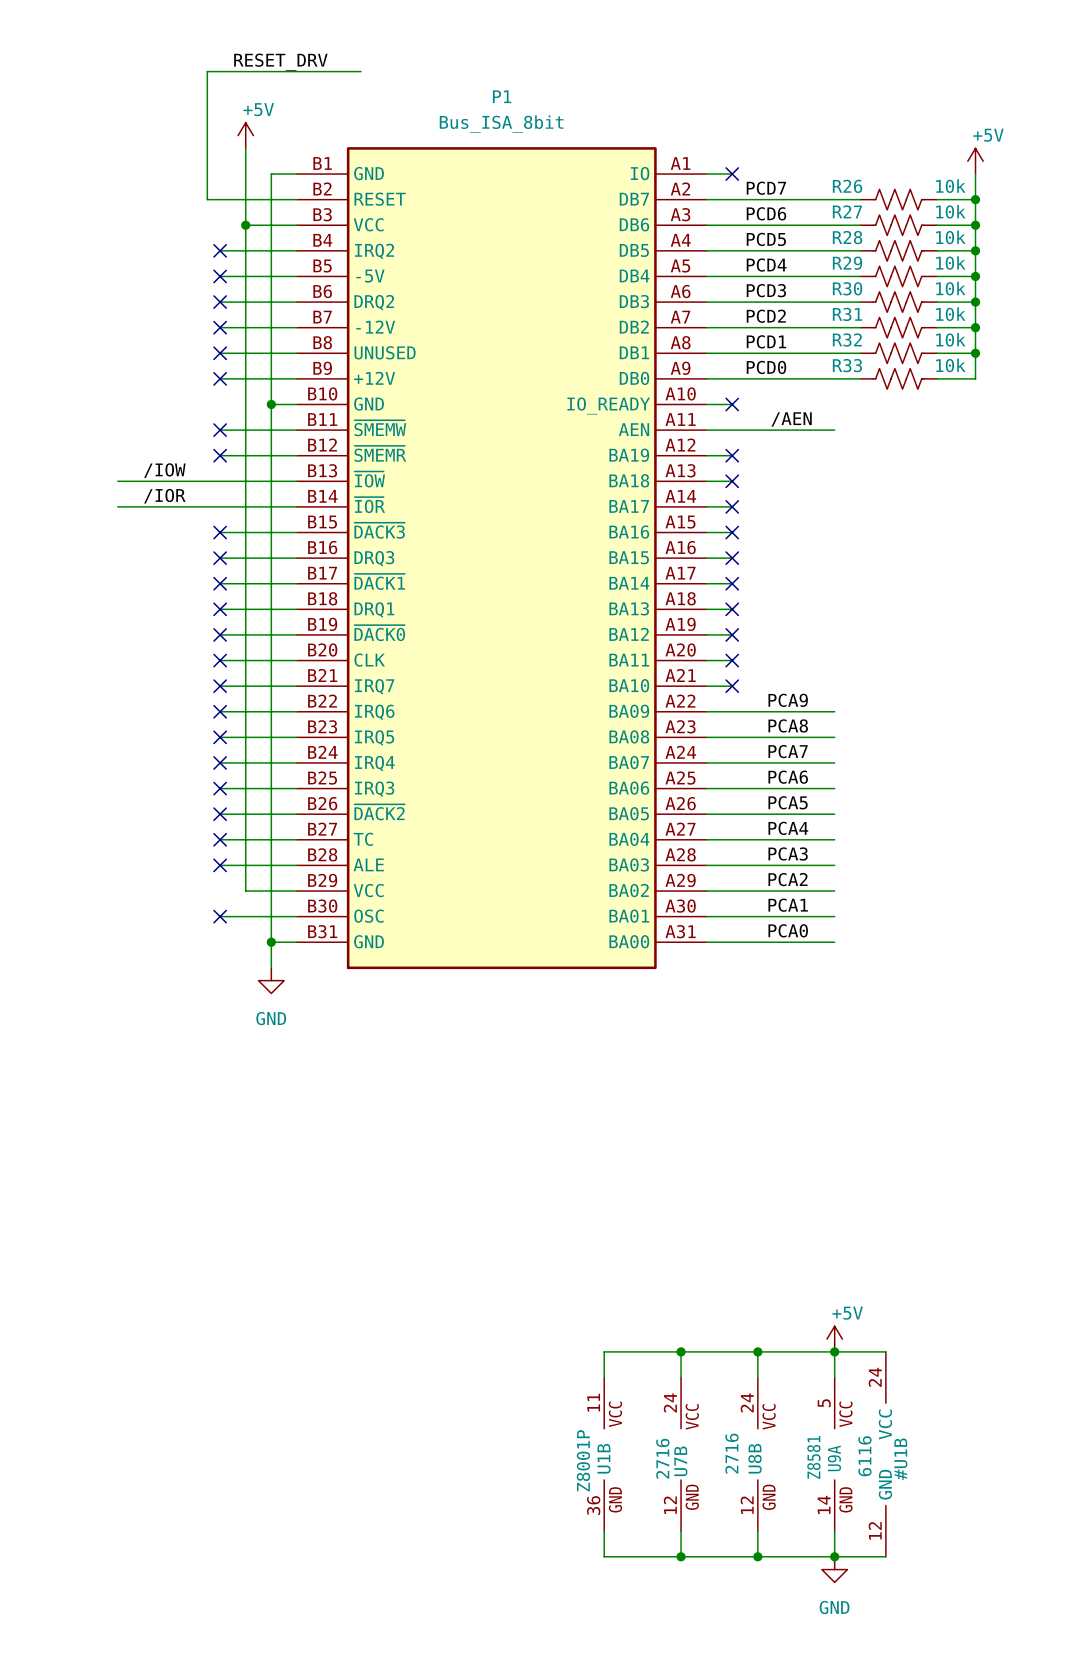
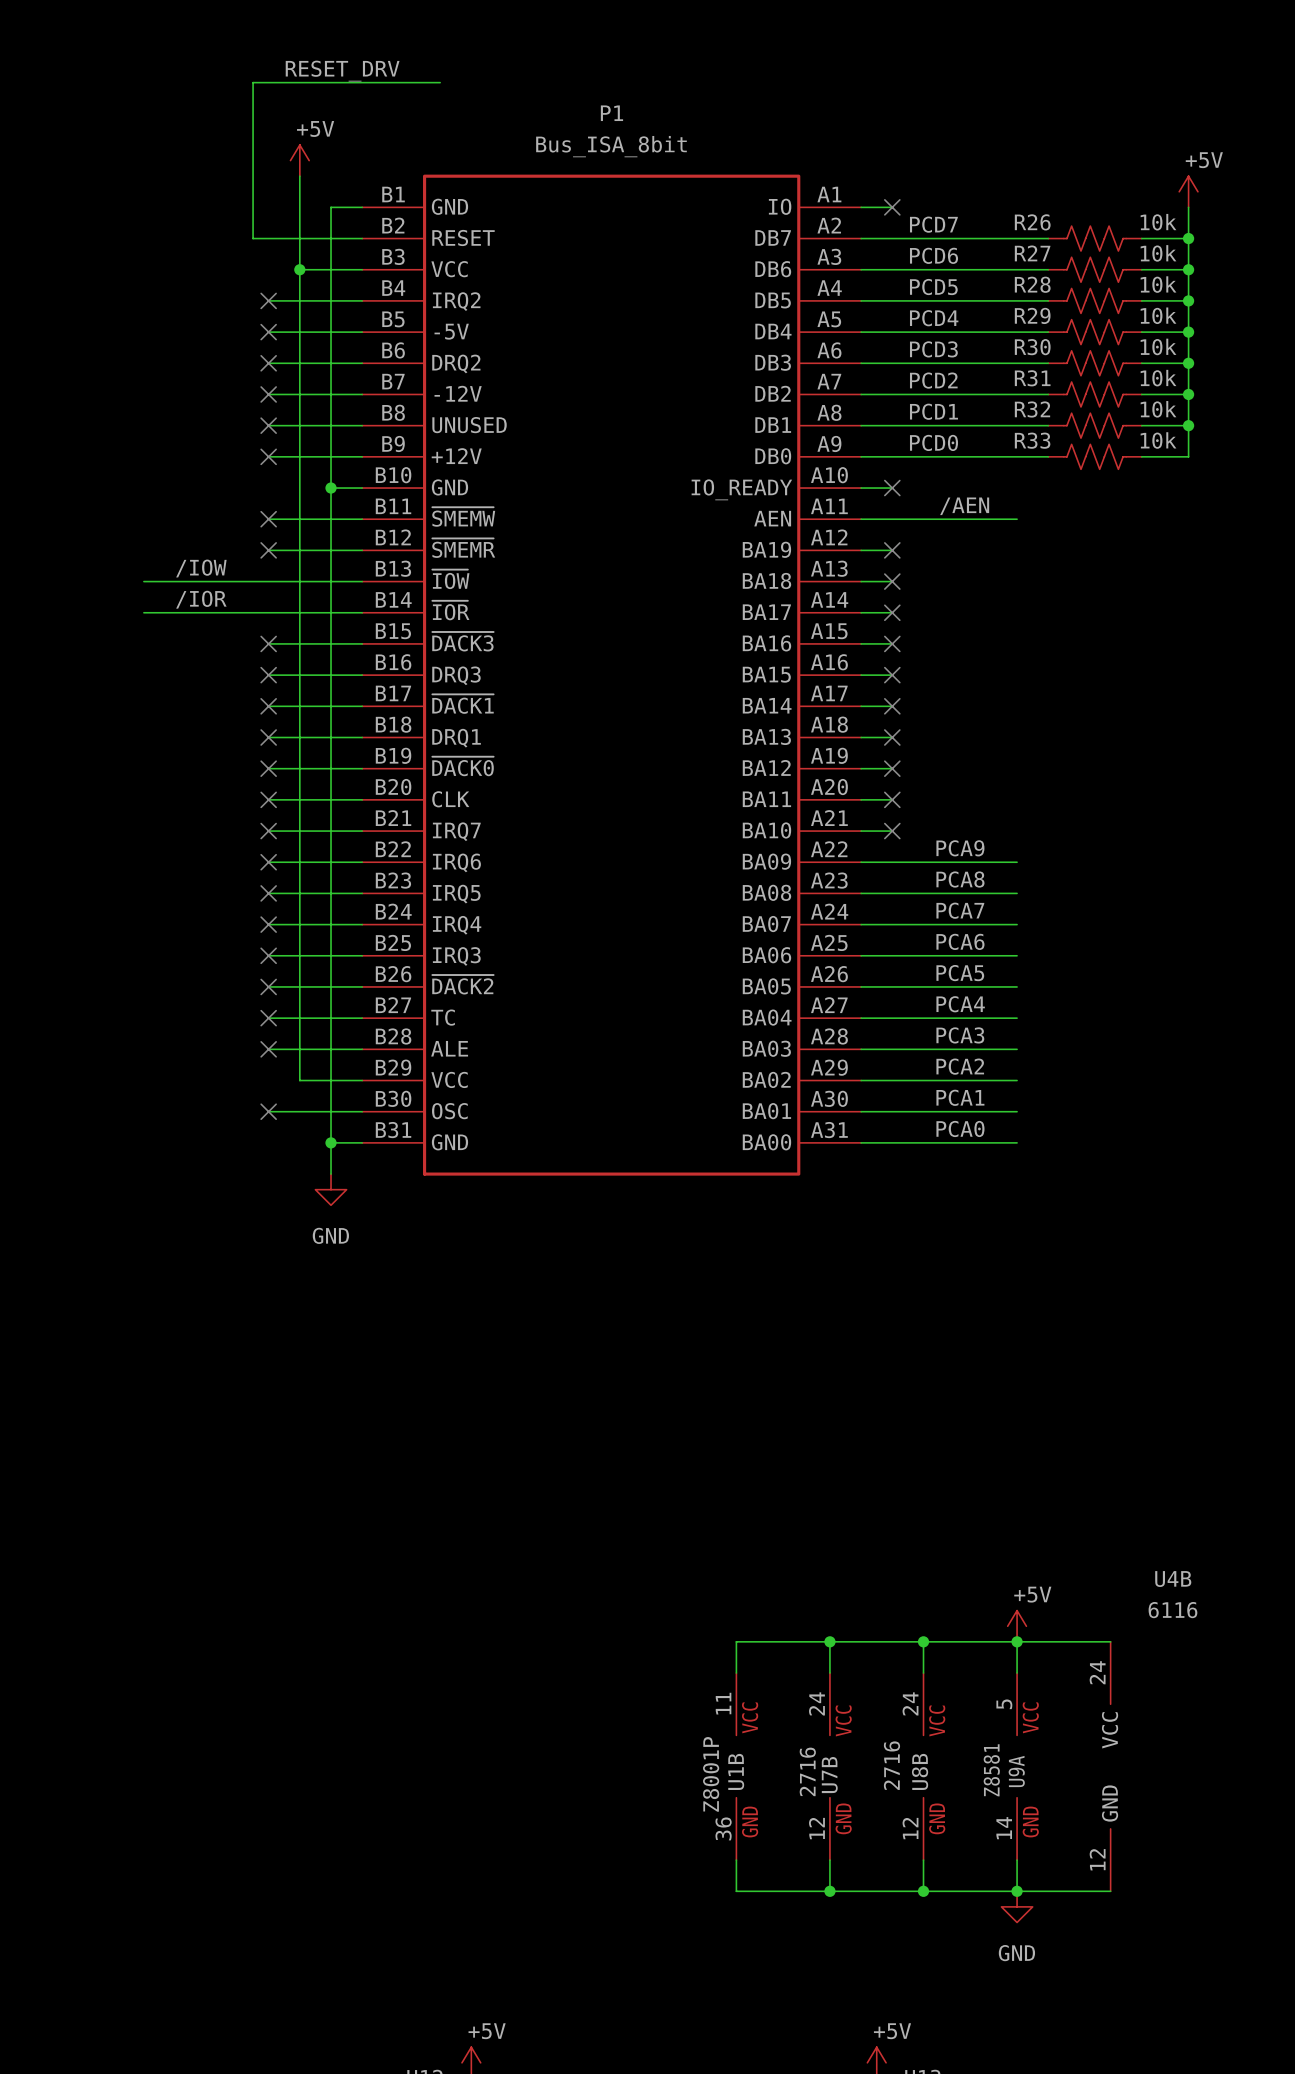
wire: none -> (1079, 1641) (1110, 1641)
#U1B: 6116 (885, 1454) -> none
U4B: none -> 6116 (1110, 1766)
wire: none -> (1079, 1891) (1110, 1891)

